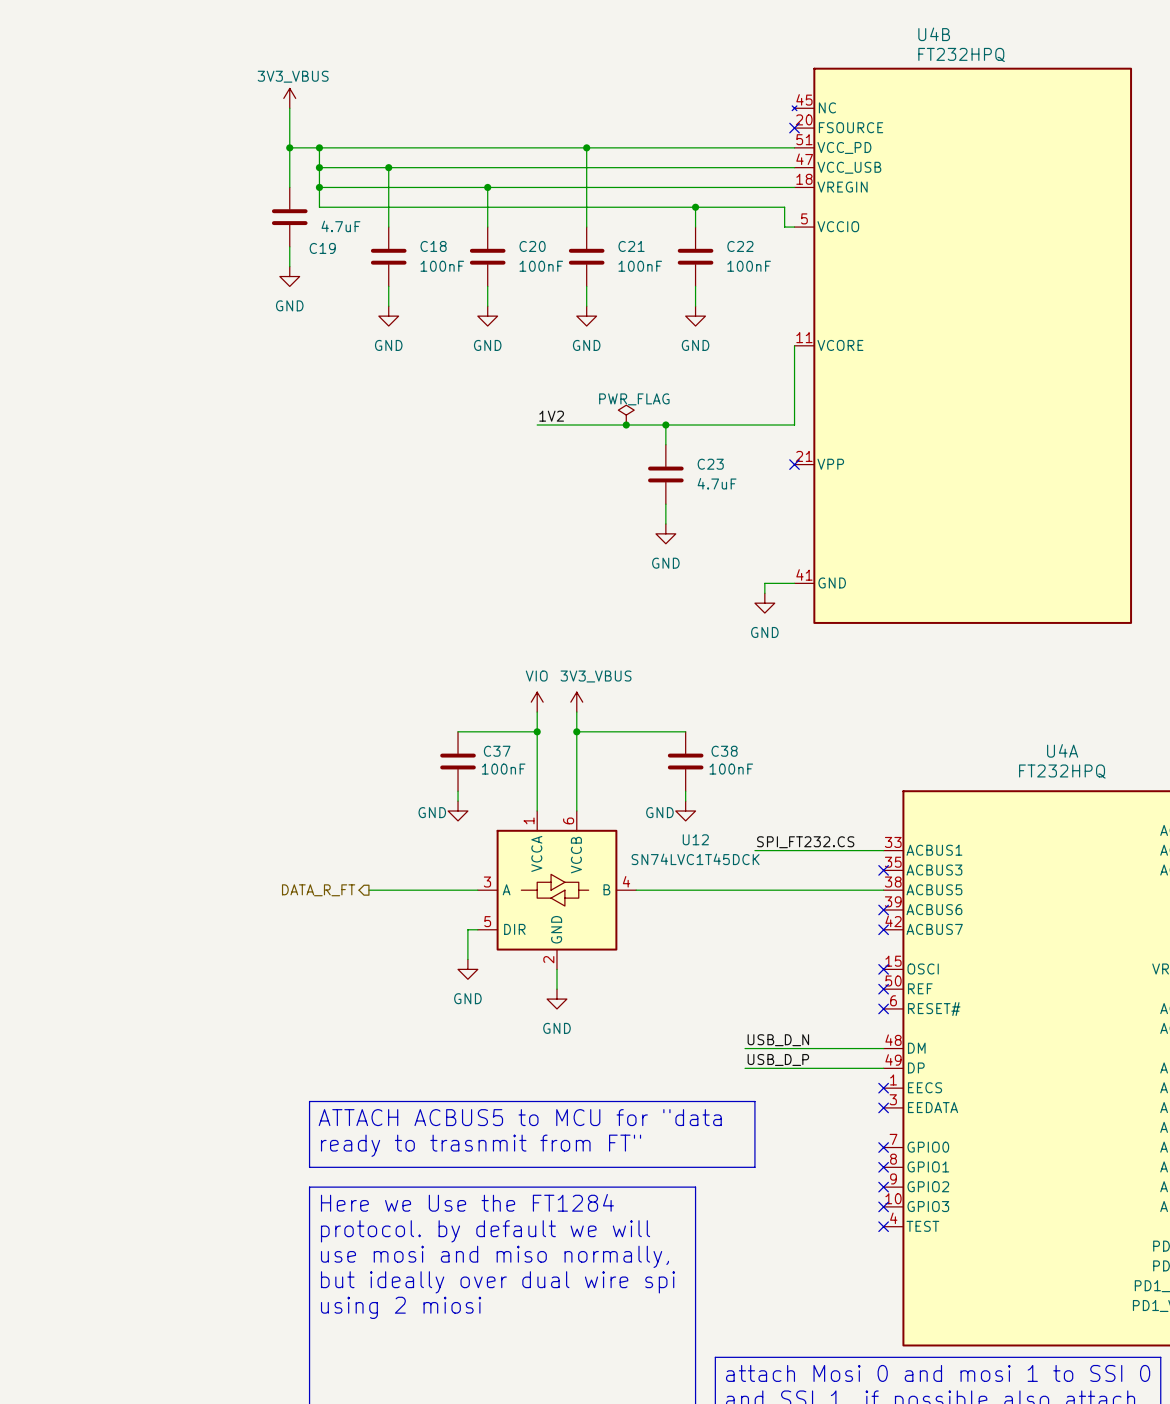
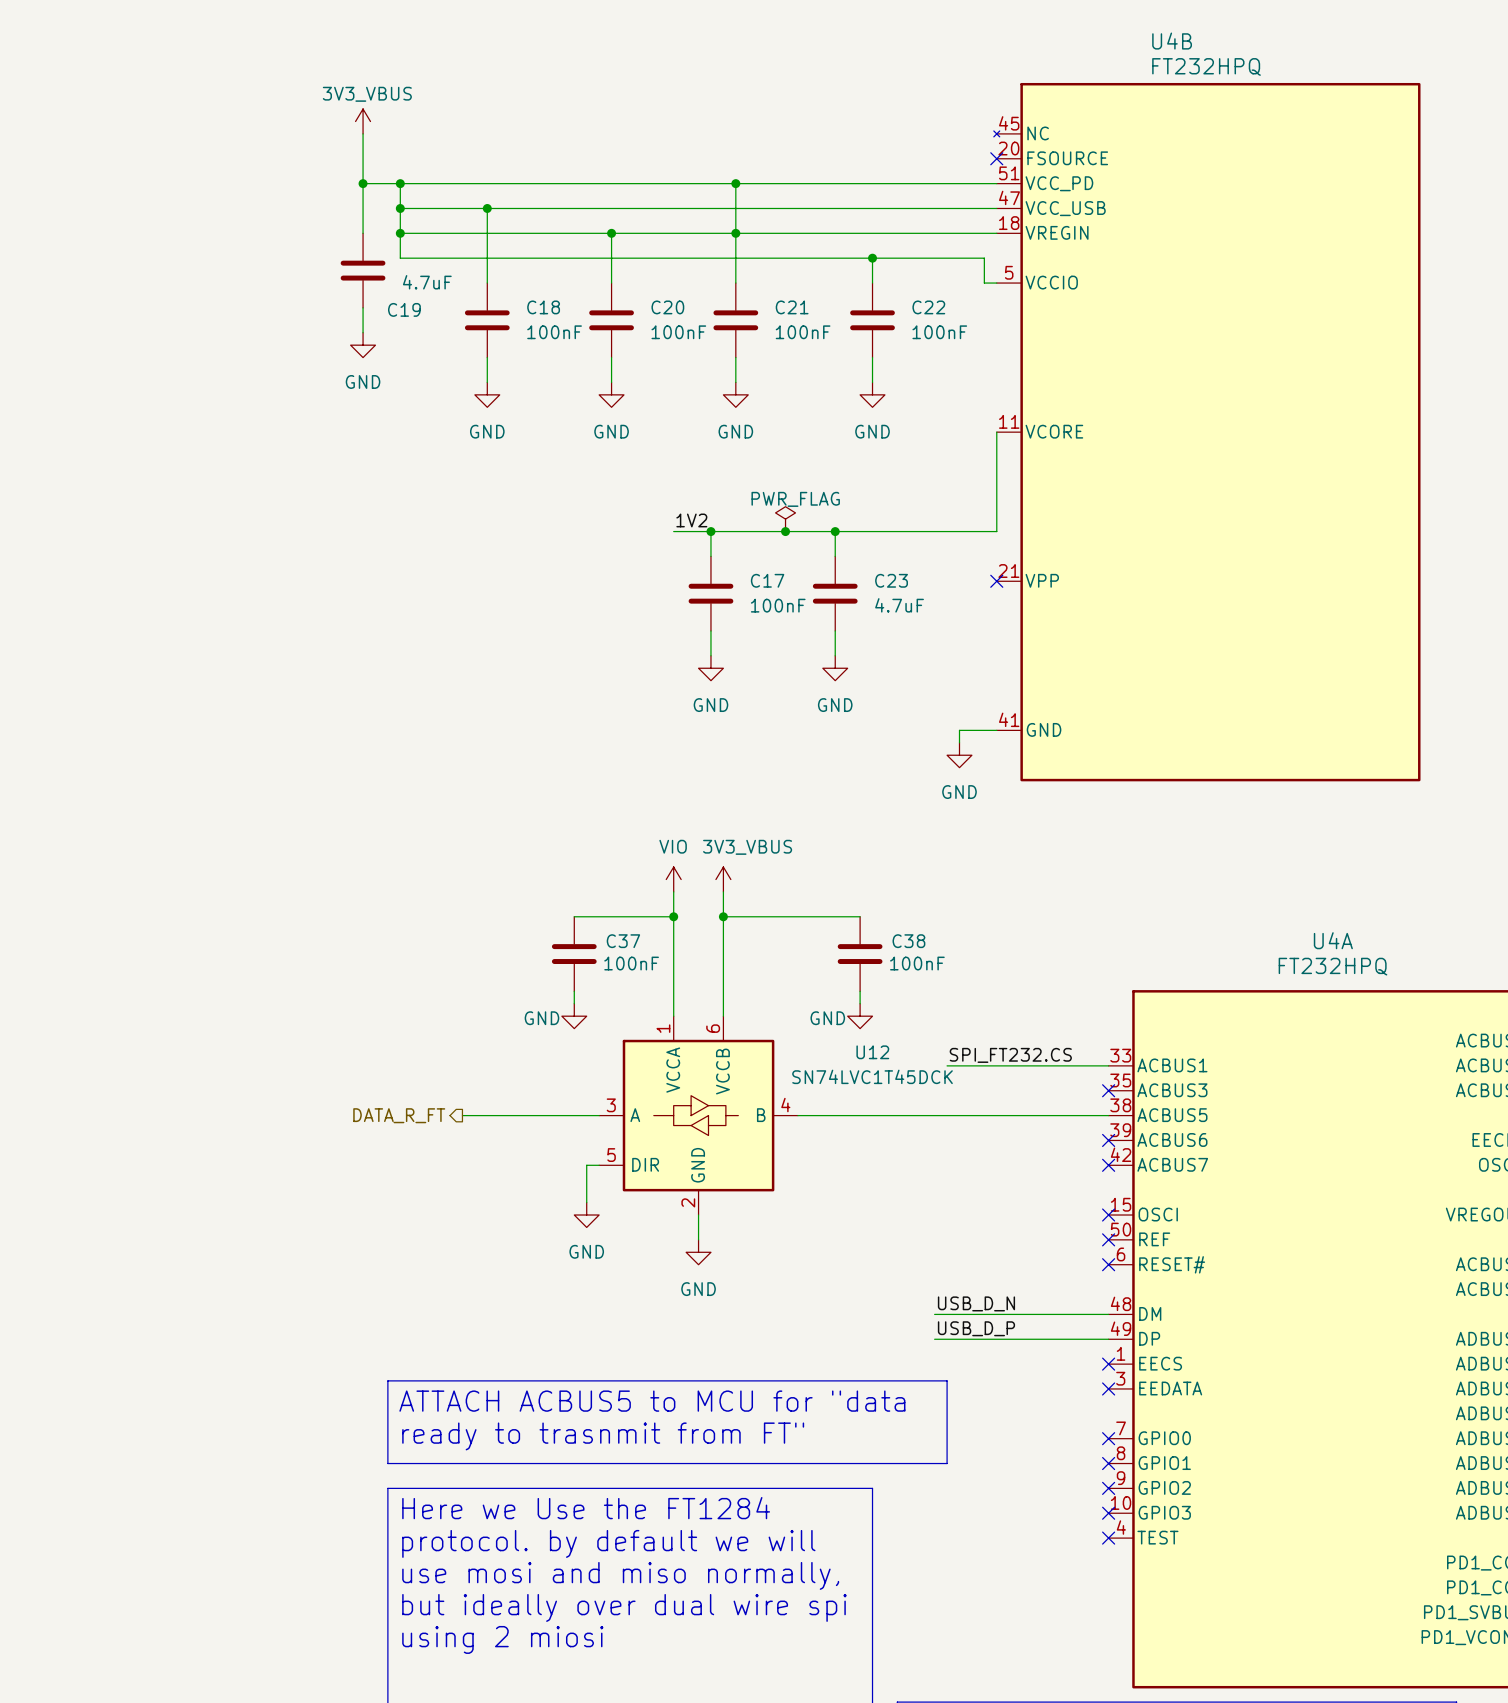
junction: none -> (735, 233)
wire: none -> (710, 531) (710, 556)
junction: none -> (710, 531)
C17: none -> 100nF (710, 593)
wire: none -> (710, 630) (710, 655)
power symbol: none -> GND (710, 668)

